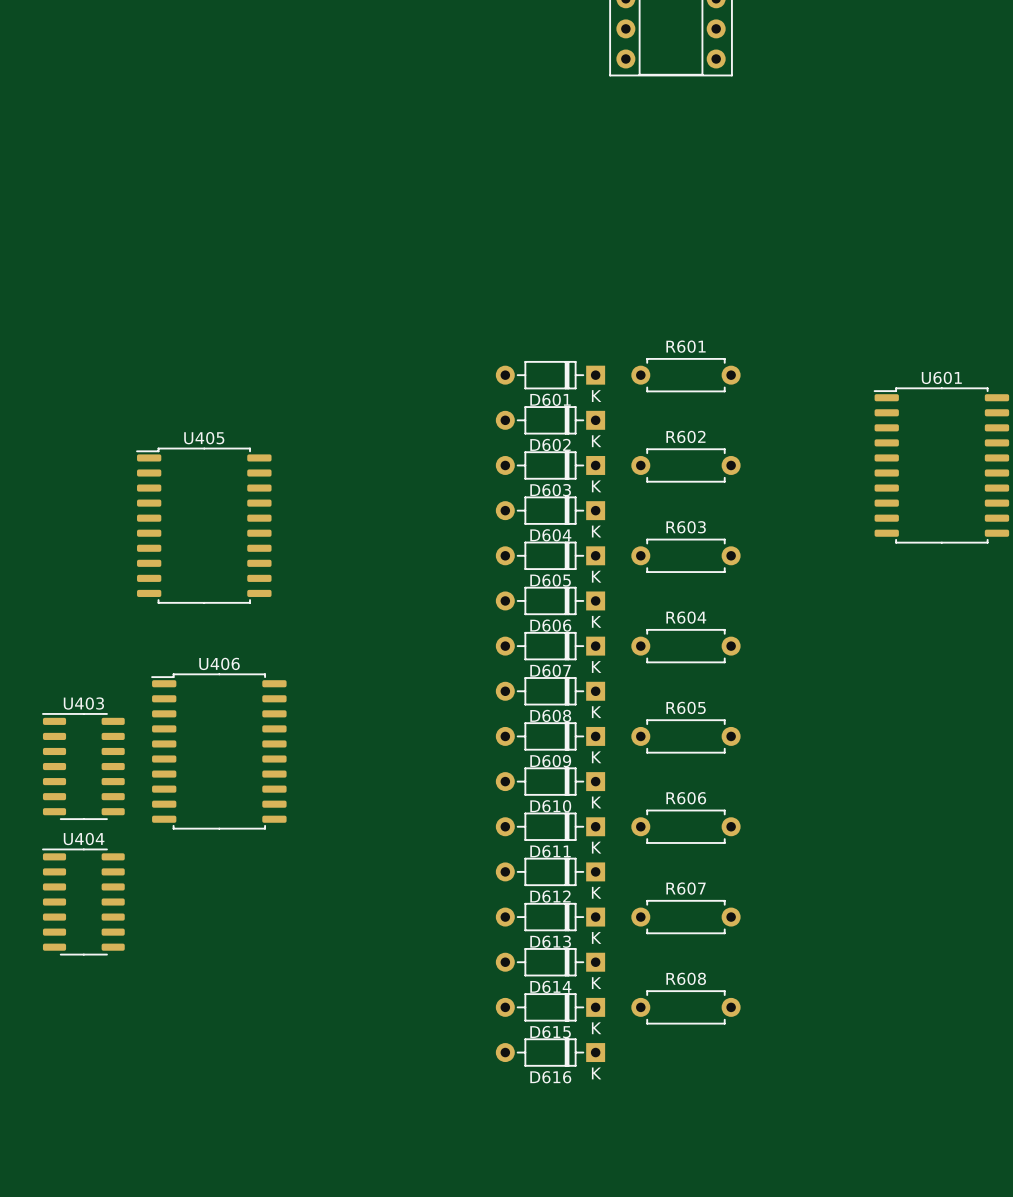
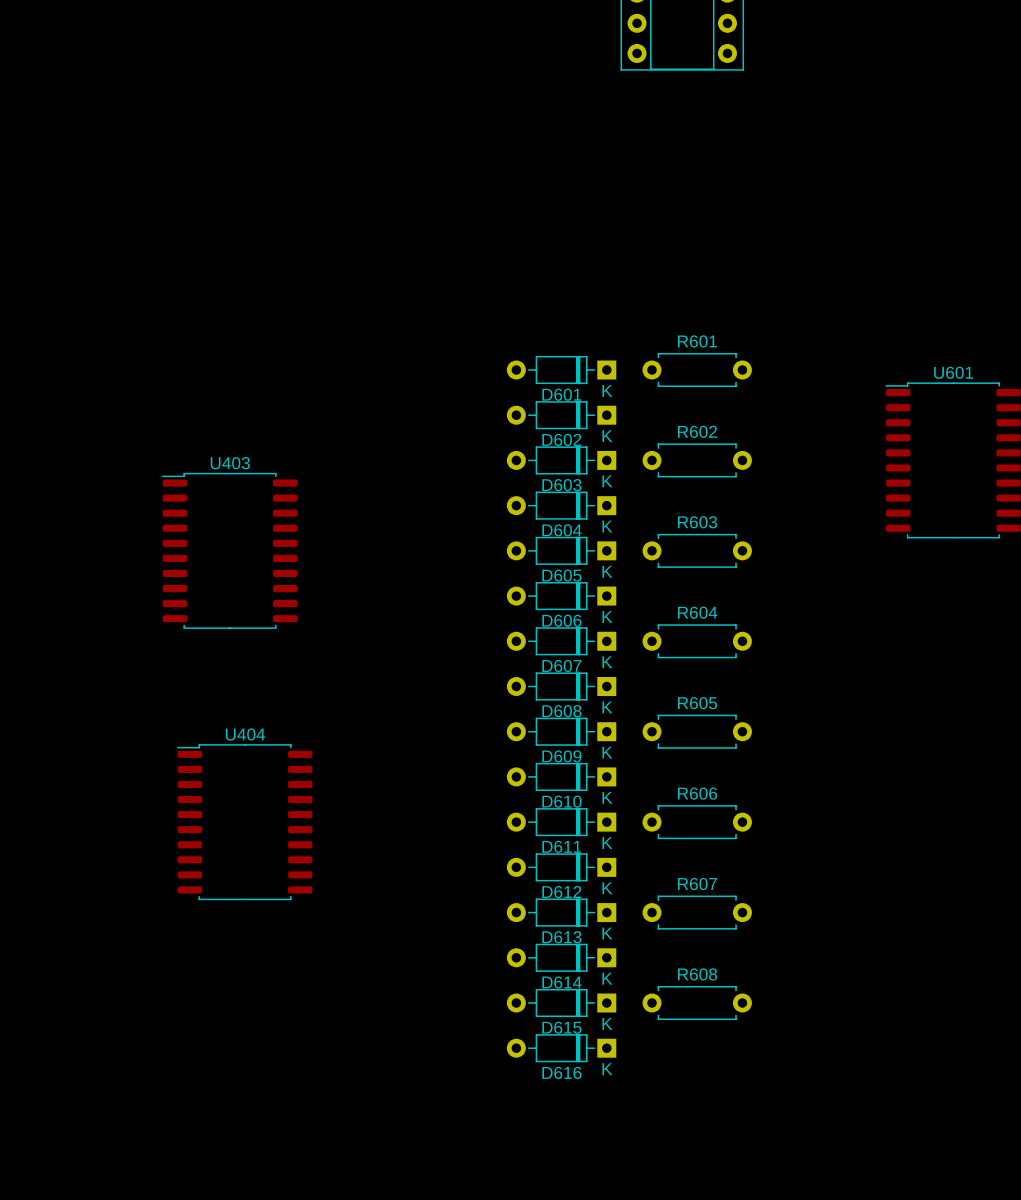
U405: (203, 525) -> none
U403 name position: U403 (83, 703) -> U403 (230, 463)
U403 footprint: [42, 713, 125, 820] -> [161, 472, 298, 629]
U406: (218, 751) -> none
U404 name position: U404 (84, 838) -> U404 (245, 734)
U404 footprint: [42, 848, 125, 956] -> [177, 744, 313, 901]

